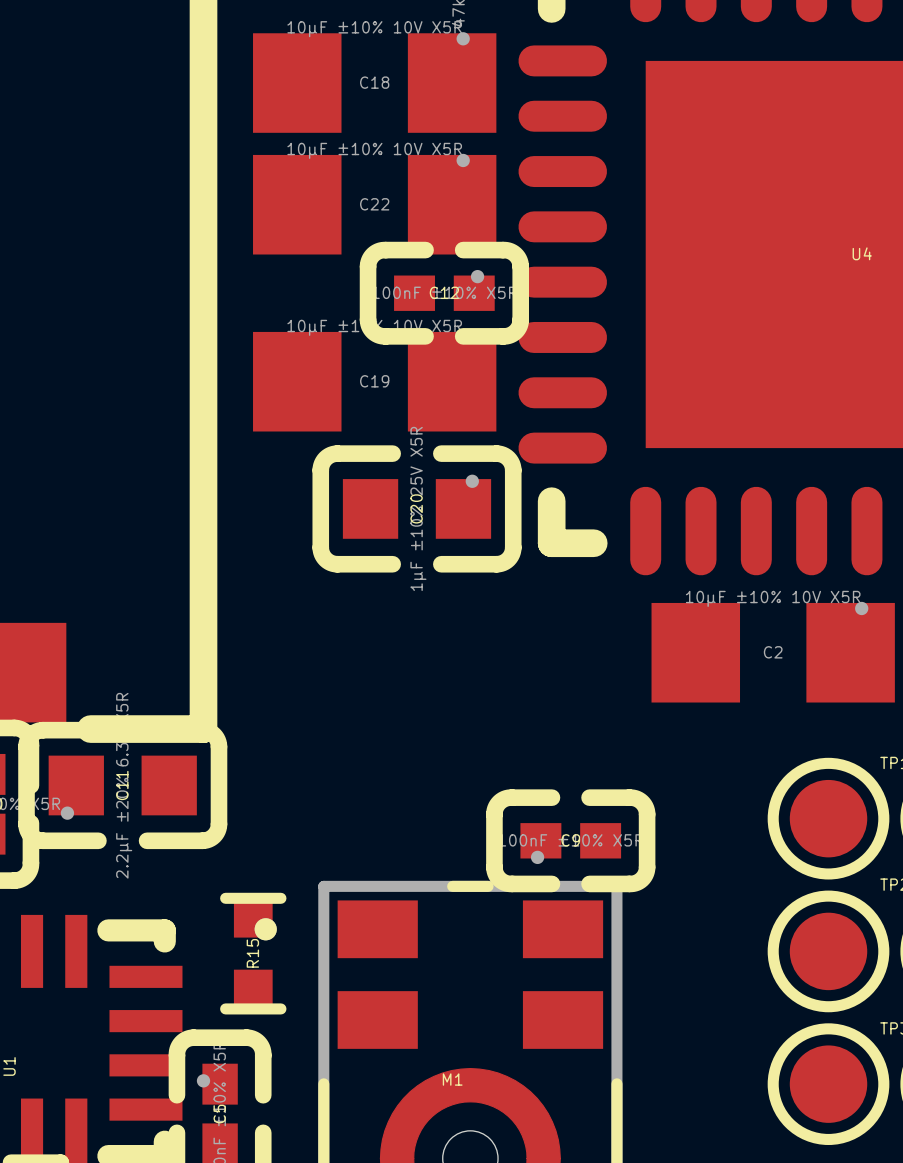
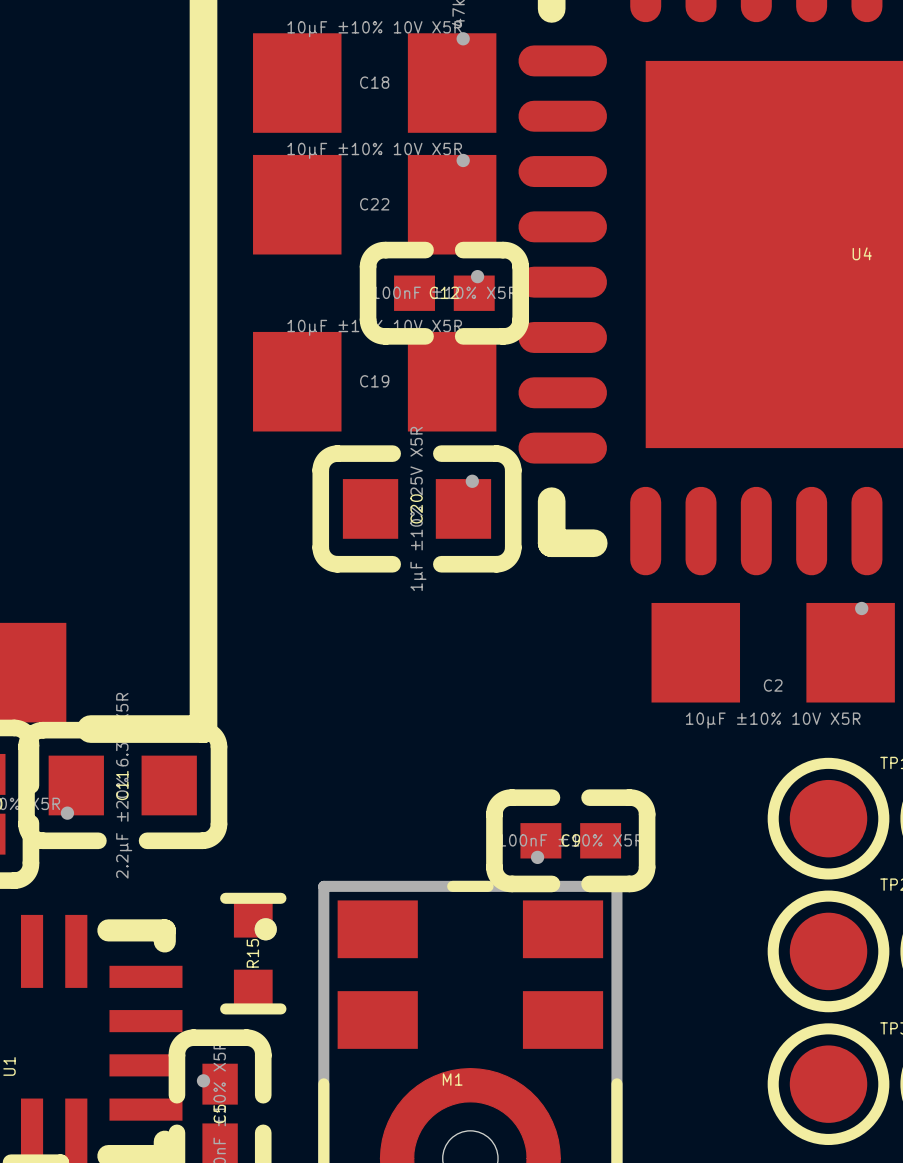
C2 value position: 10µF ±10% 10V X5R (773, 598) -> 10µF ±10% 10V X5R (773, 720)
C2 name position: C2 (773, 652) -> C2 (773, 685)

